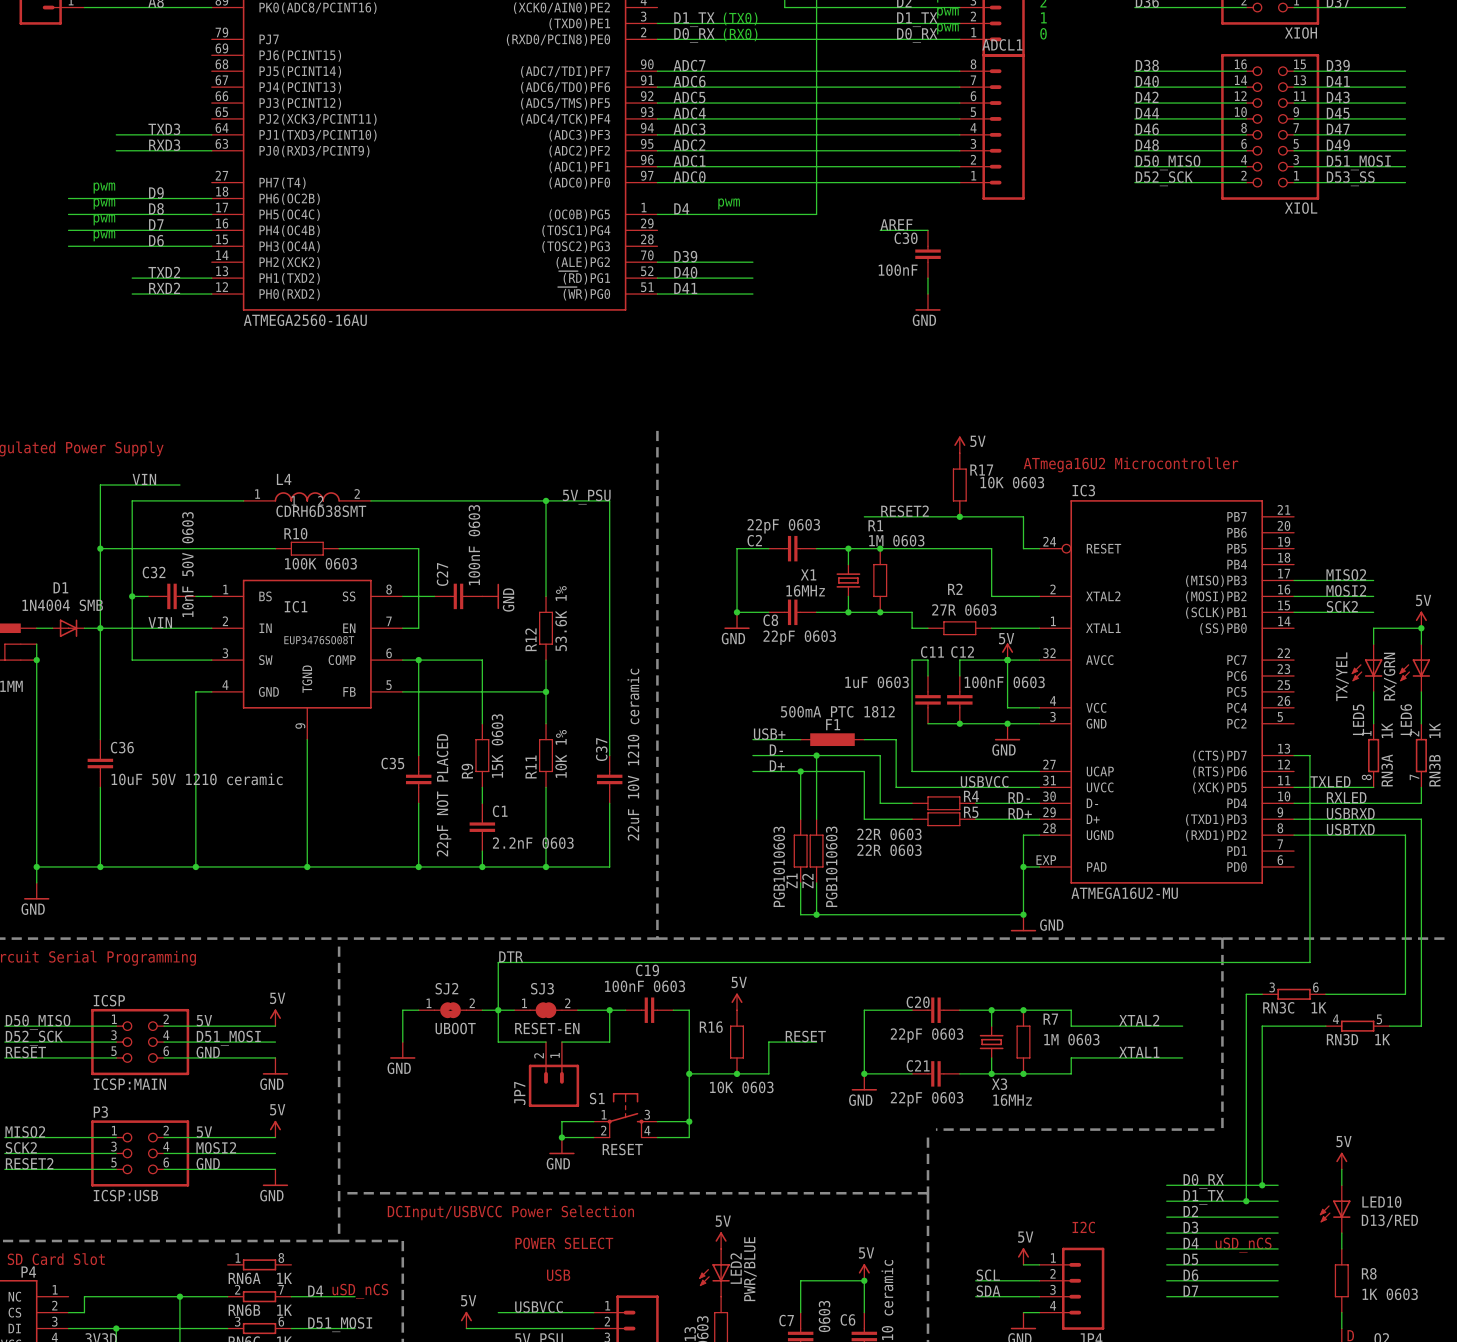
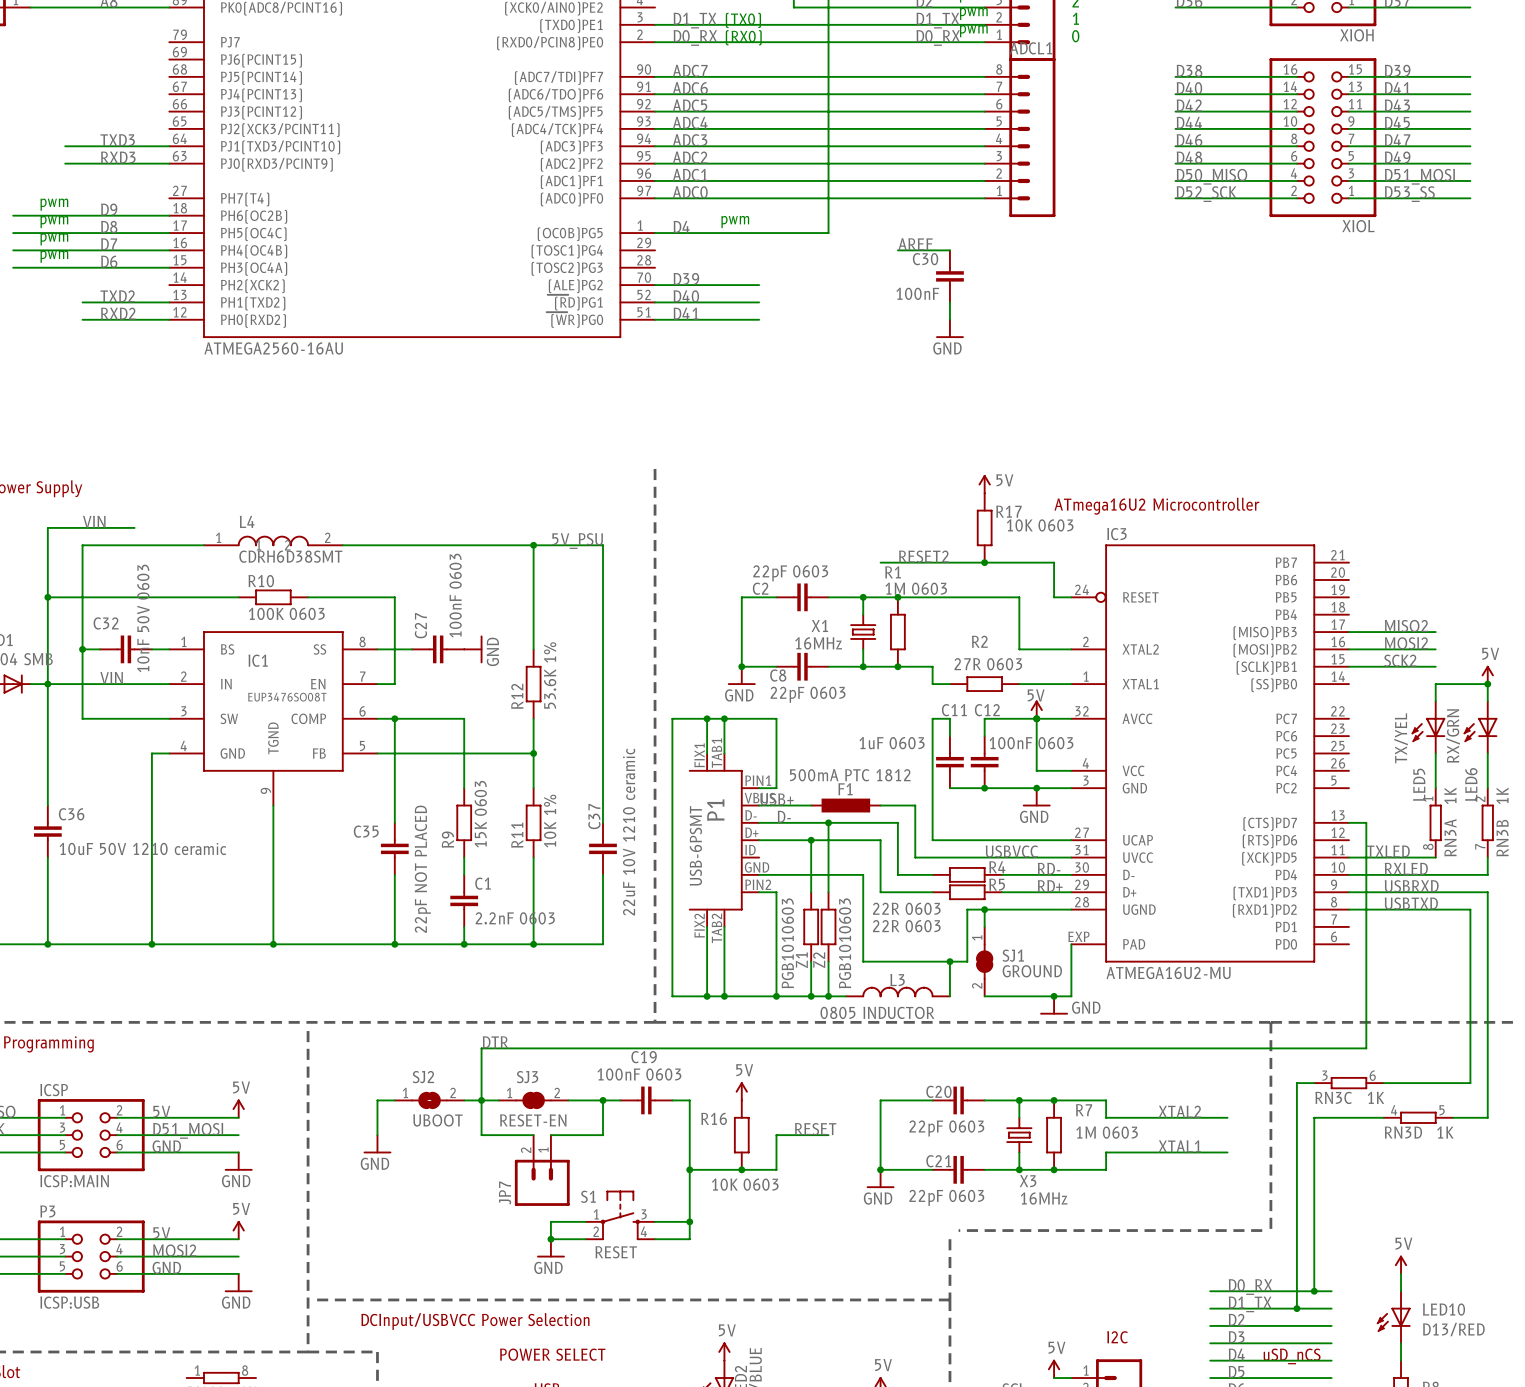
wire: none -> (707, 718) (707, 753)
junction: none -> (707, 718)
wire: none -> (724, 718) (724, 753)
junction: none -> (724, 718)
wire: none -> (759, 788) (776, 788) (776, 718) (672, 718) (672, 996) (811, 996)
label: D+ (777, 765) -> none
P1: none -> USB-6PSMT (724, 840)
wire: none -> (759, 874) (863, 874) (863, 961) (967, 961) (967, 909) (1054, 909)
wire: none -> (759, 892) (776, 892) (776, 996)
wire: none -> (984, 909) (984, 926)
junction: none -> (984, 909)
wire: (1023, 835) (1023, 914) -> (1071, 944) (1071, 996) (1054, 996)
wire: none -> (707, 926) (707, 996)
wire: none -> (724, 926) (724, 996)
wire: (1023, 866) (1039, 866) -> none
junction: (1023, 866) -> none
wire: none -> (949, 961) (949, 996)
junction: none -> (949, 961)
SJ1: none -> GROUND (984, 961)
L3: none -> 0805 INDUCTOR (897, 992)
junction: none -> (707, 996)
junction: none -> (724, 996)
junction: none -> (776, 996)
junction: none -> (811, 996)
wire: (832, 914) (959, 914) -> none

